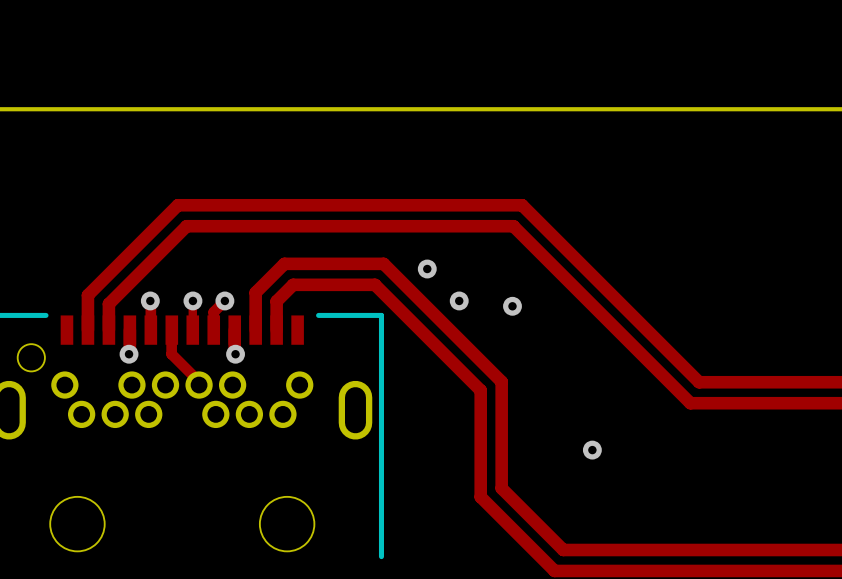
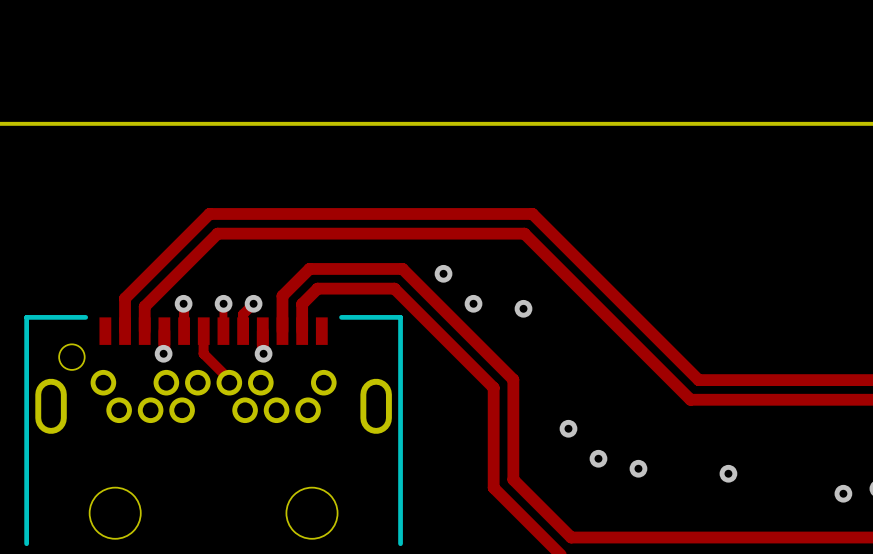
via: none -> (568, 428)
via position: (592, 450) -> (598, 458)
via: none -> (638, 468)
via: none -> (728, 473)

